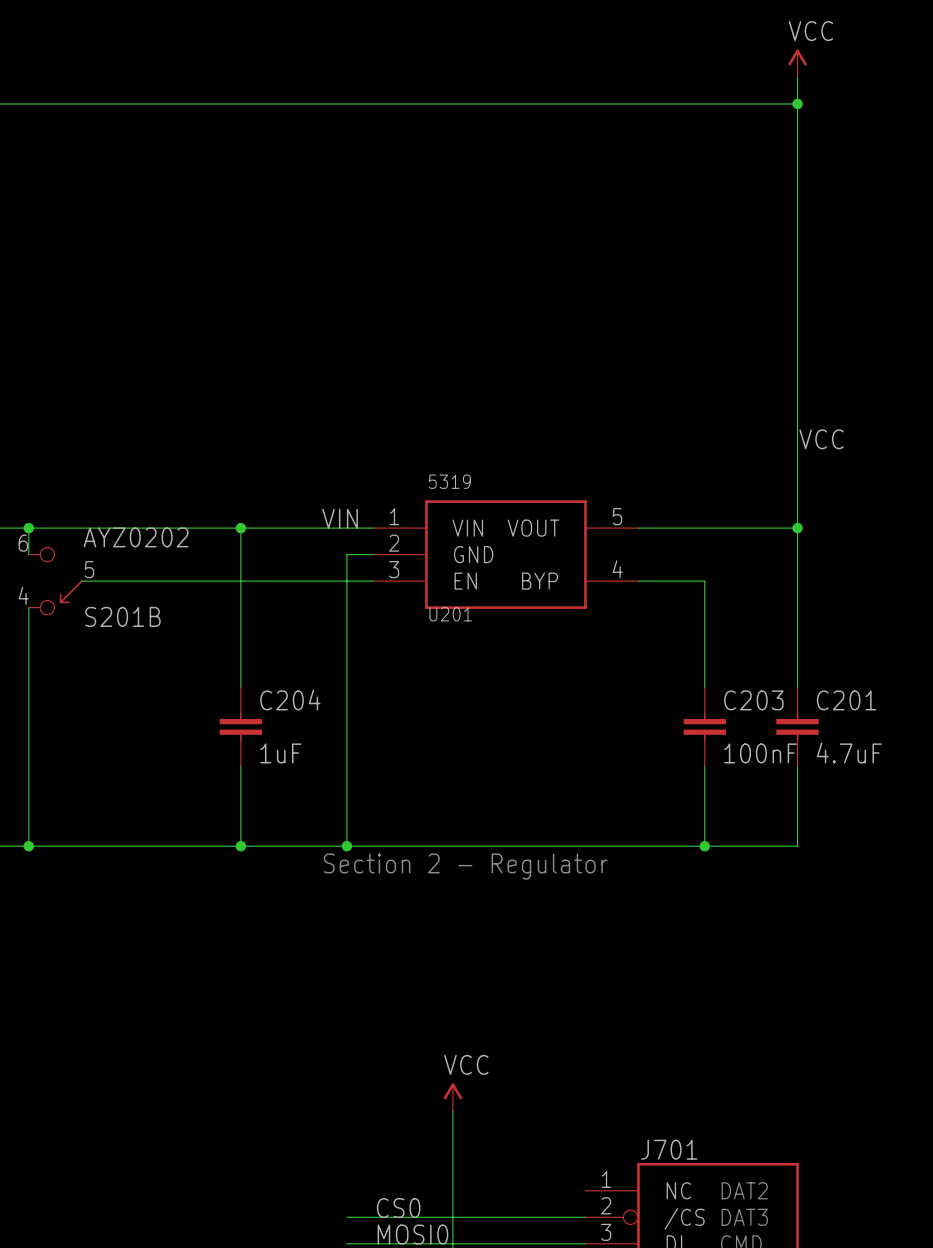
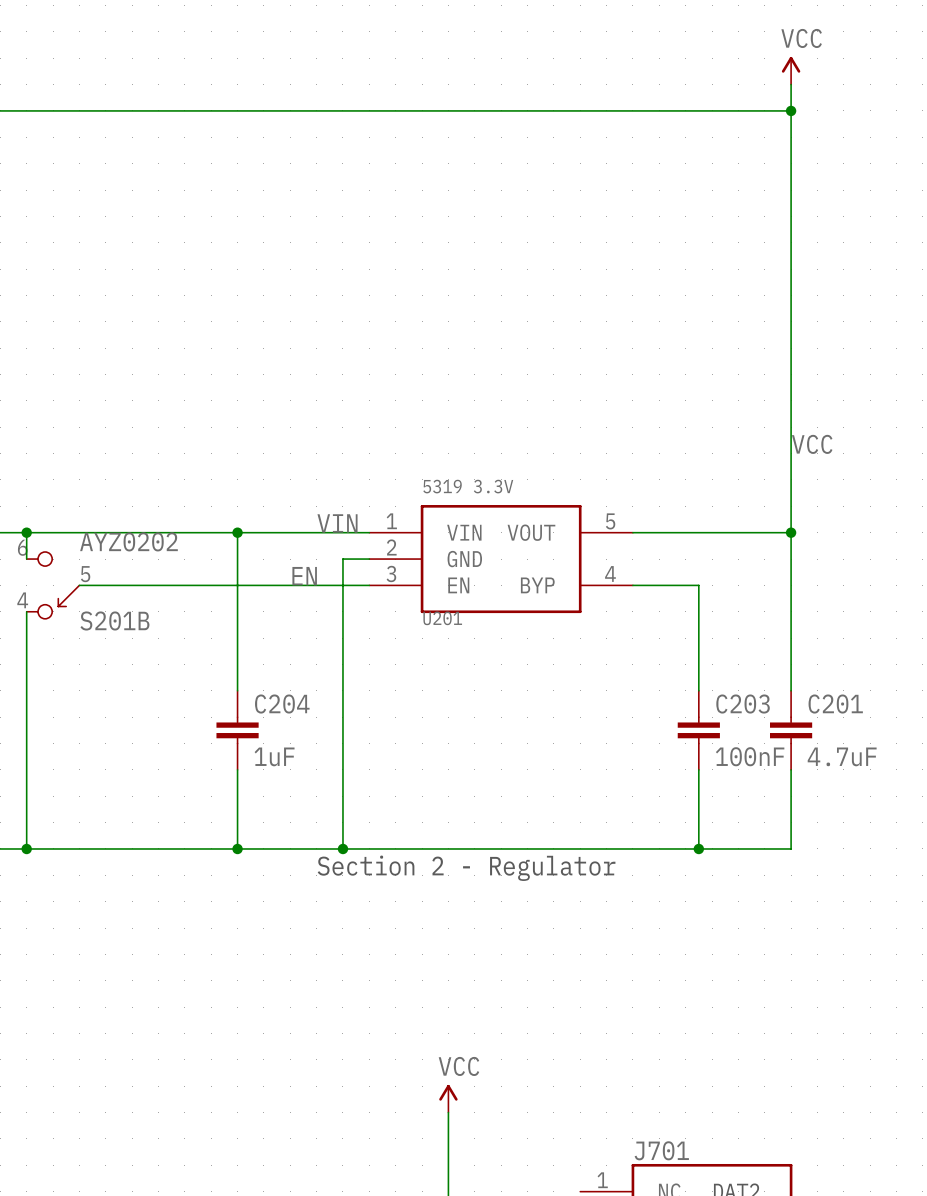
U201 value: 5319 (449, 481) -> 5319 3.3V (468, 486)
label: none -> EN (304, 576)

